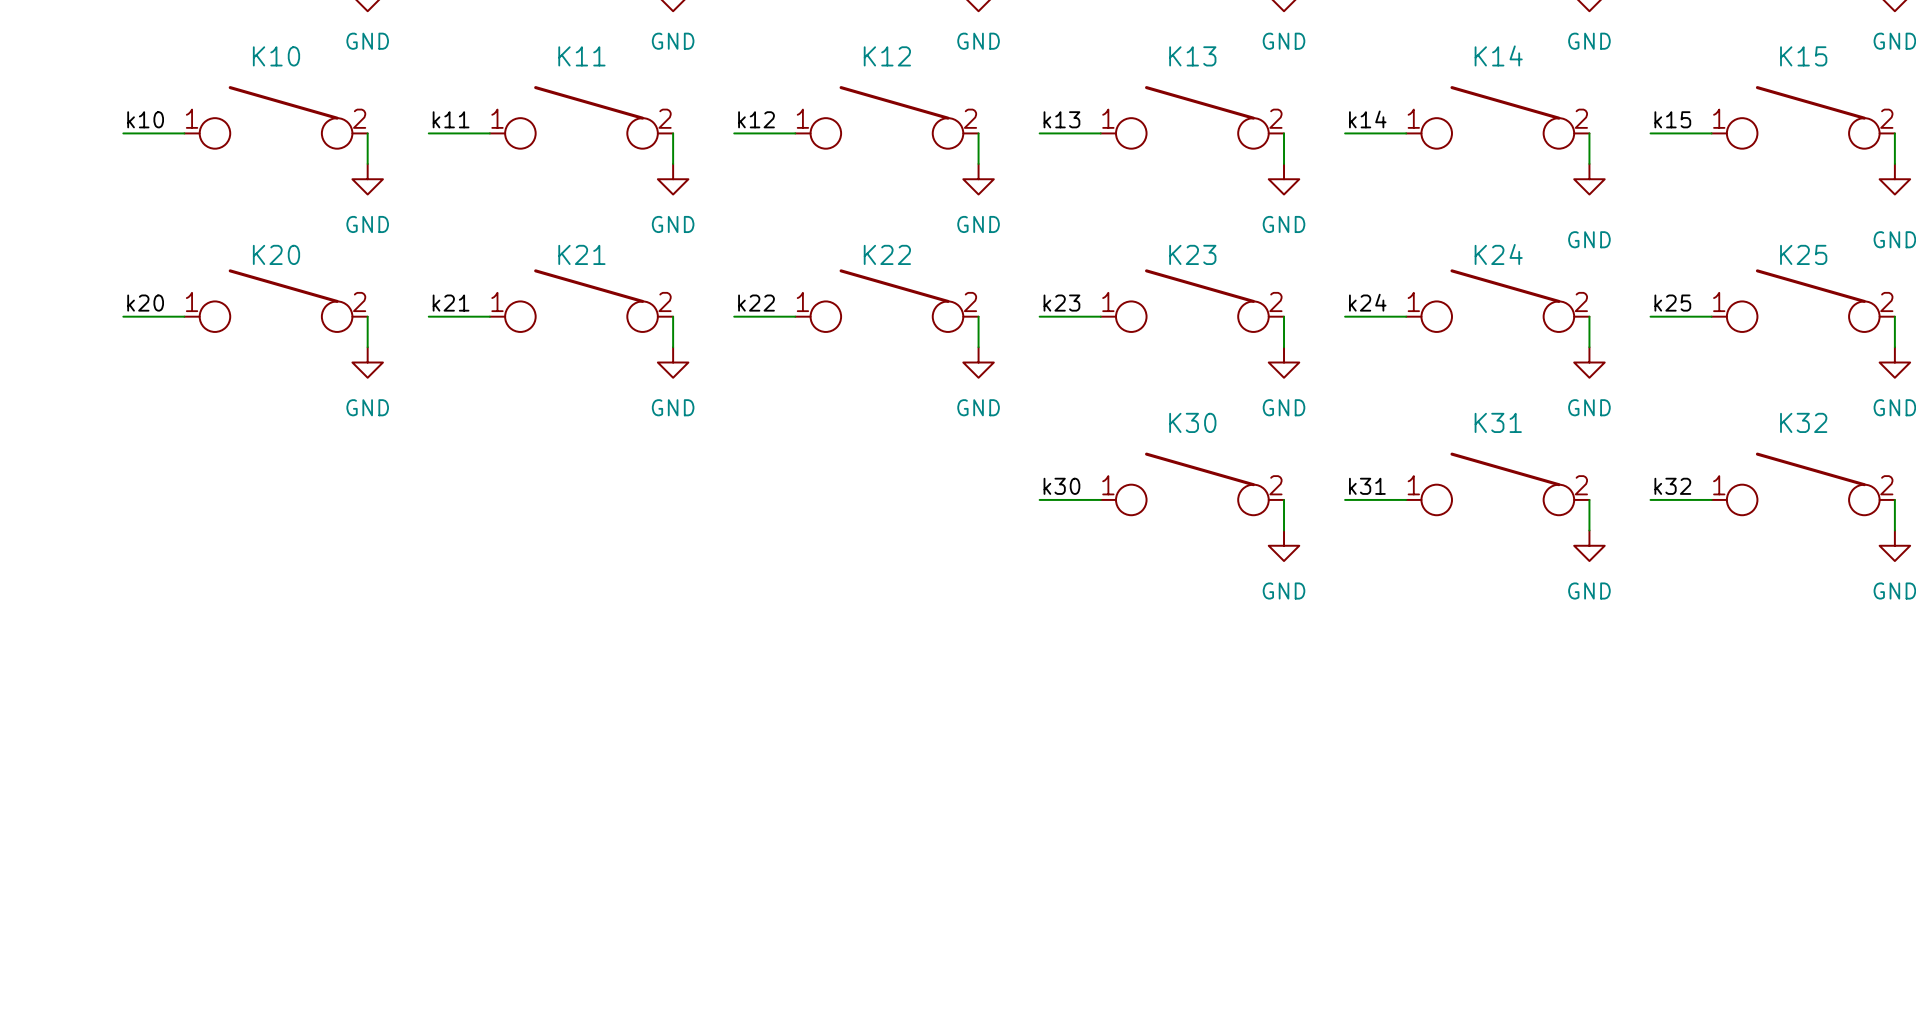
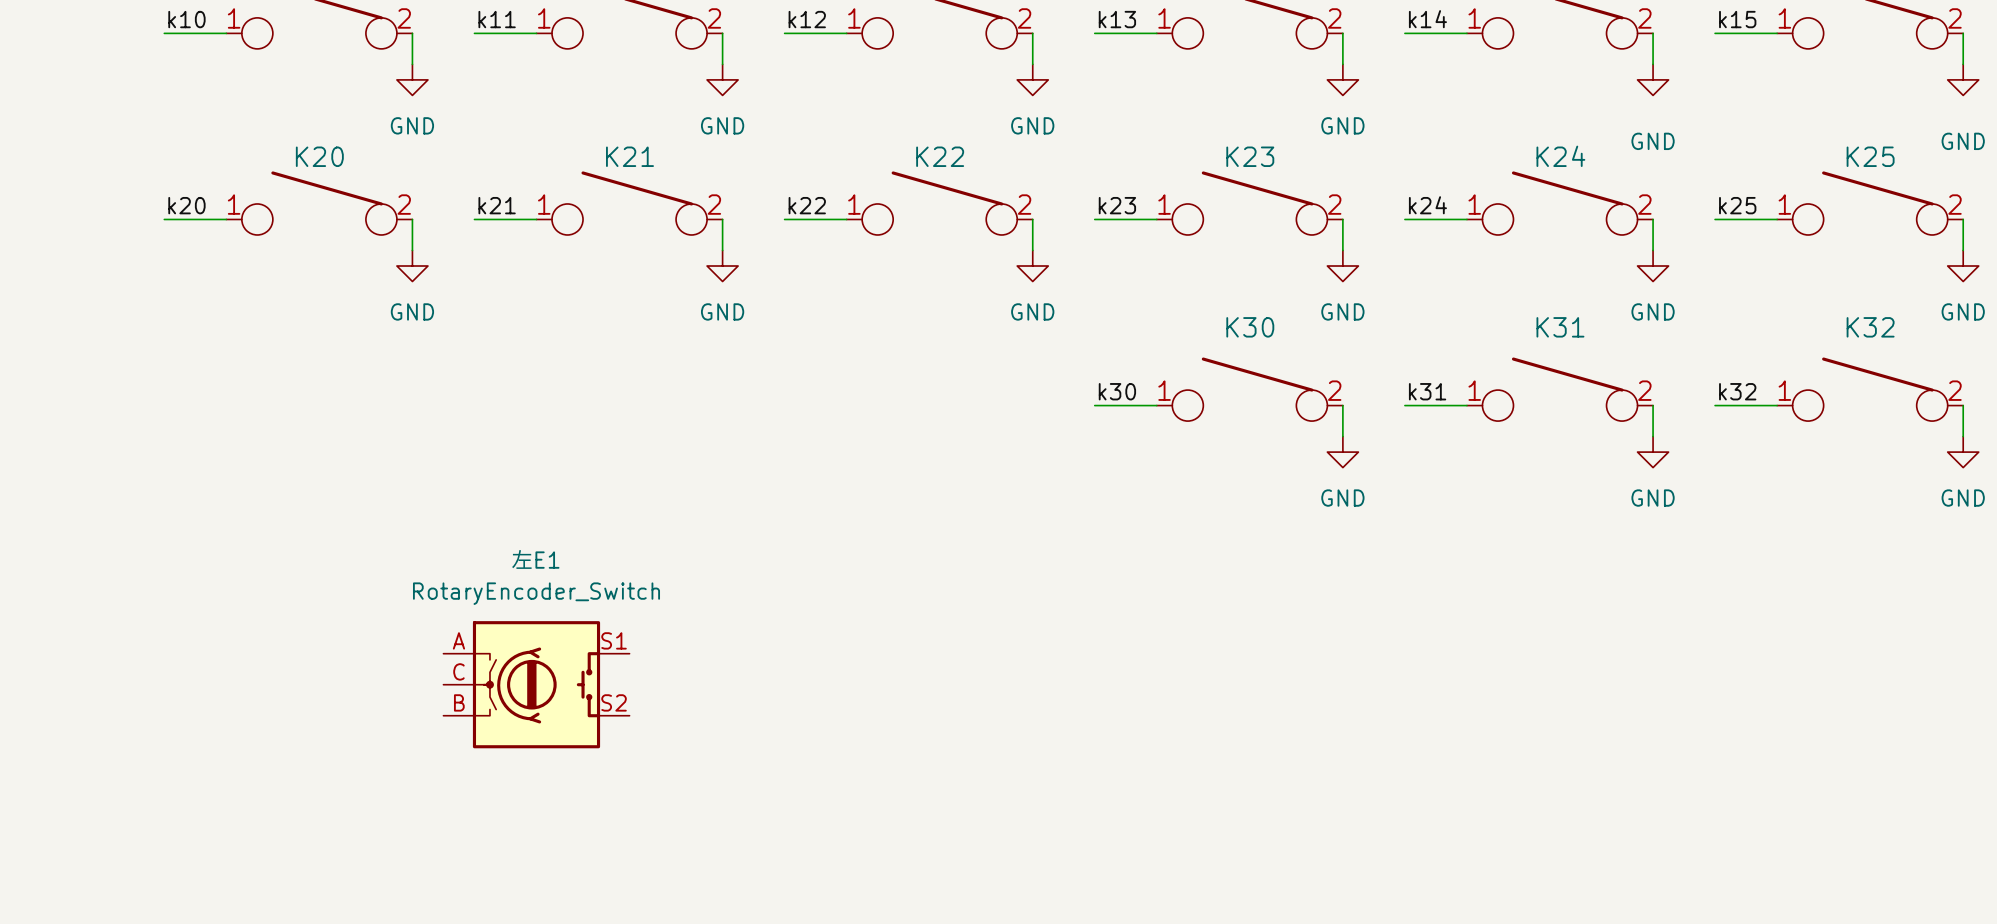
左E1: none -> RotaryEncoder_Switch (536, 684)

